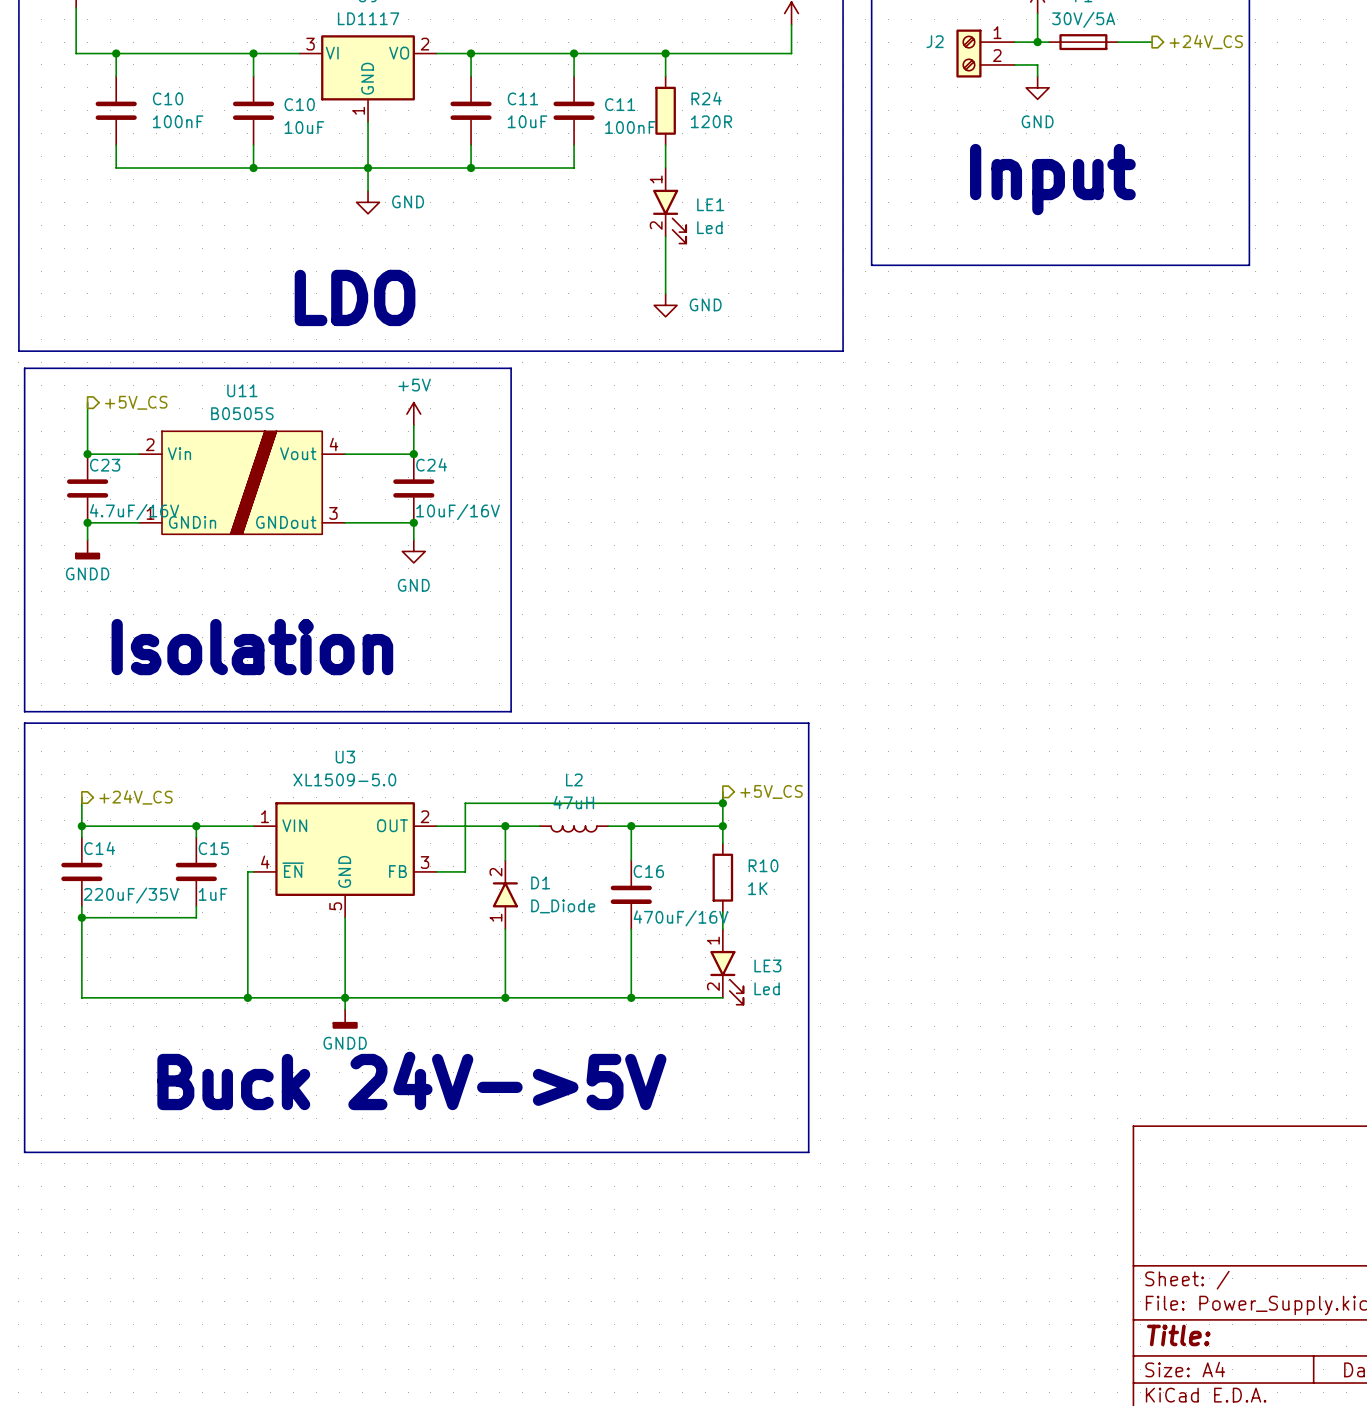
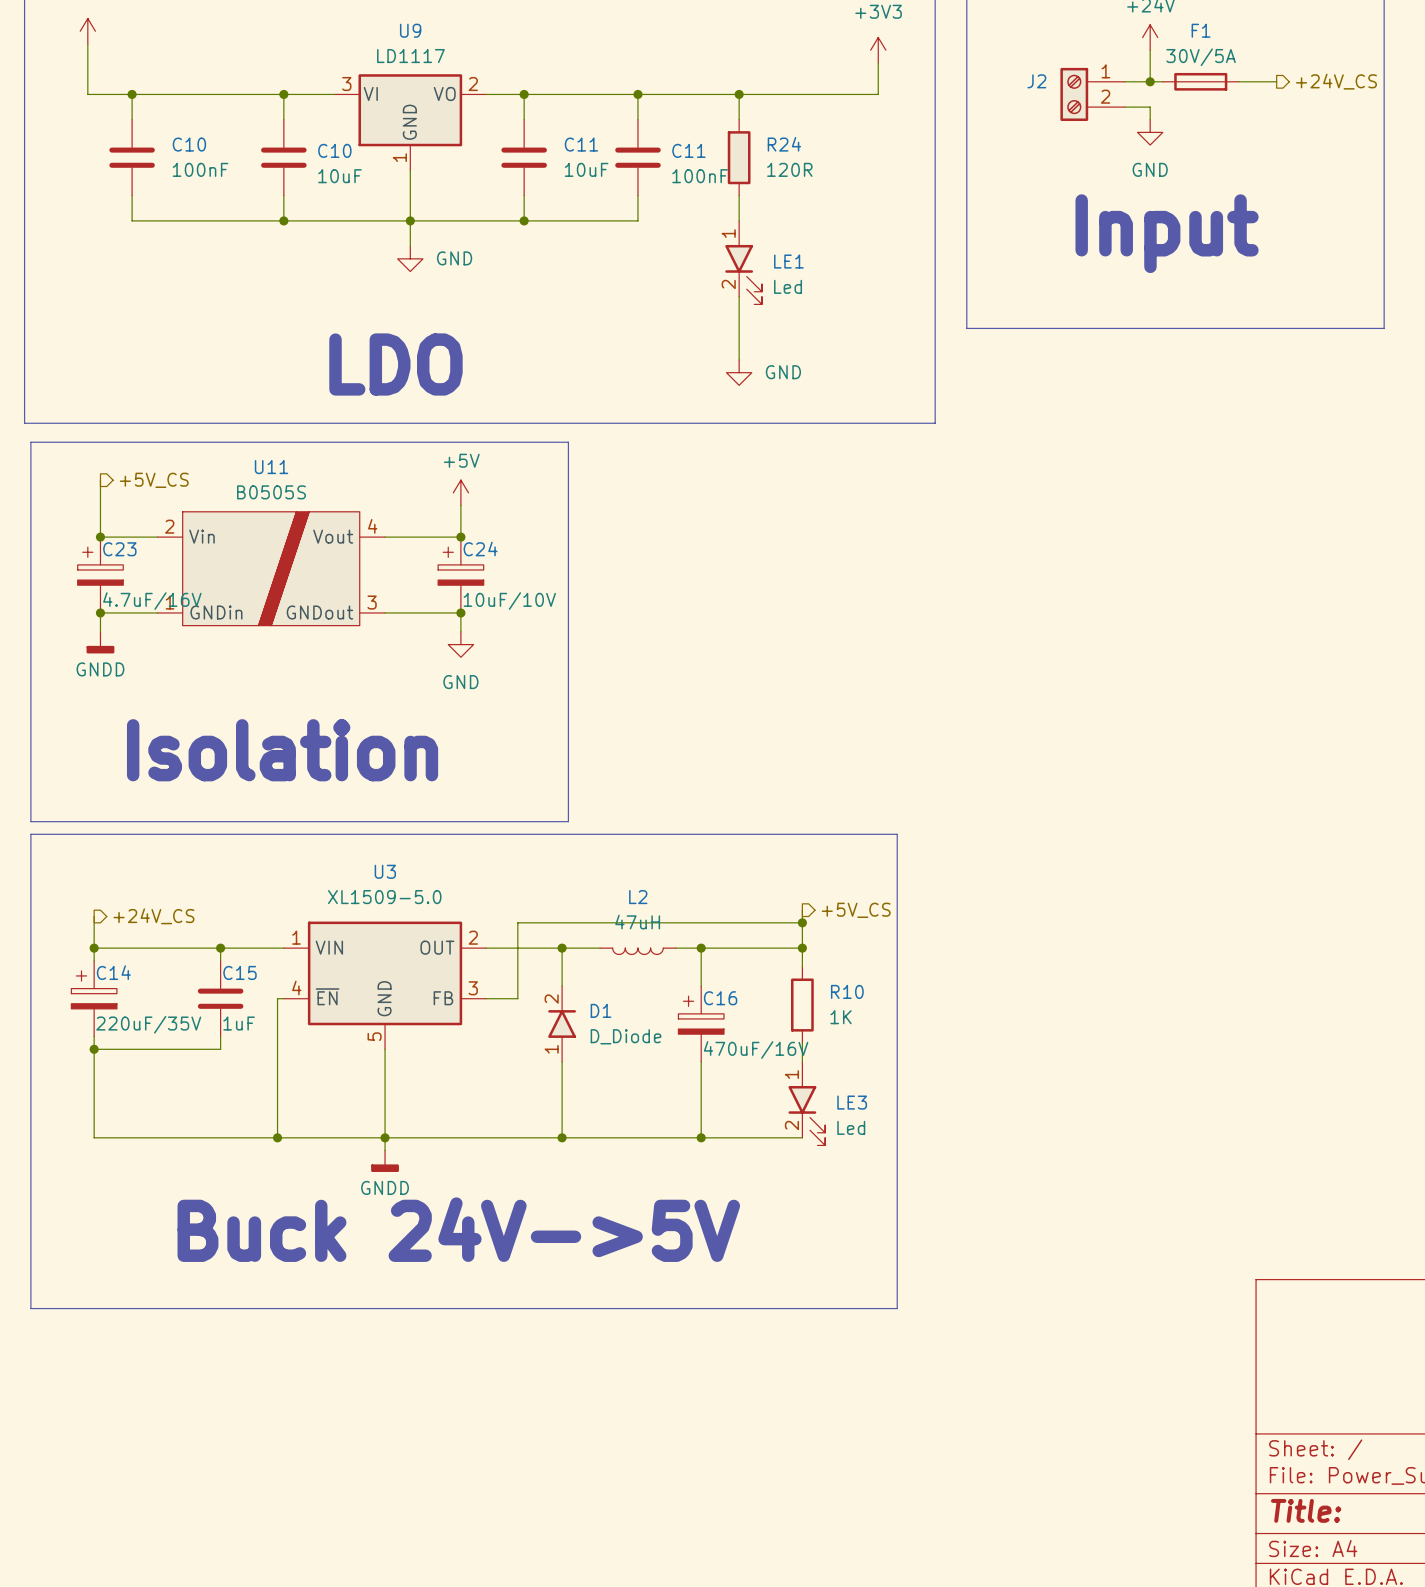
C23 symbol: [66, 454, 109, 523] -> [77, 537, 124, 613]
C24 symbol: [393, 454, 435, 523] -> [438, 537, 484, 613]
C24 value: 10uF/16V (458, 512) -> 10uF/10V (509, 601)
C14 symbol: [61, 837, 103, 907] -> [71, 960, 117, 1037]
C16 symbol: [610, 860, 652, 930] -> [678, 986, 724, 1062]

